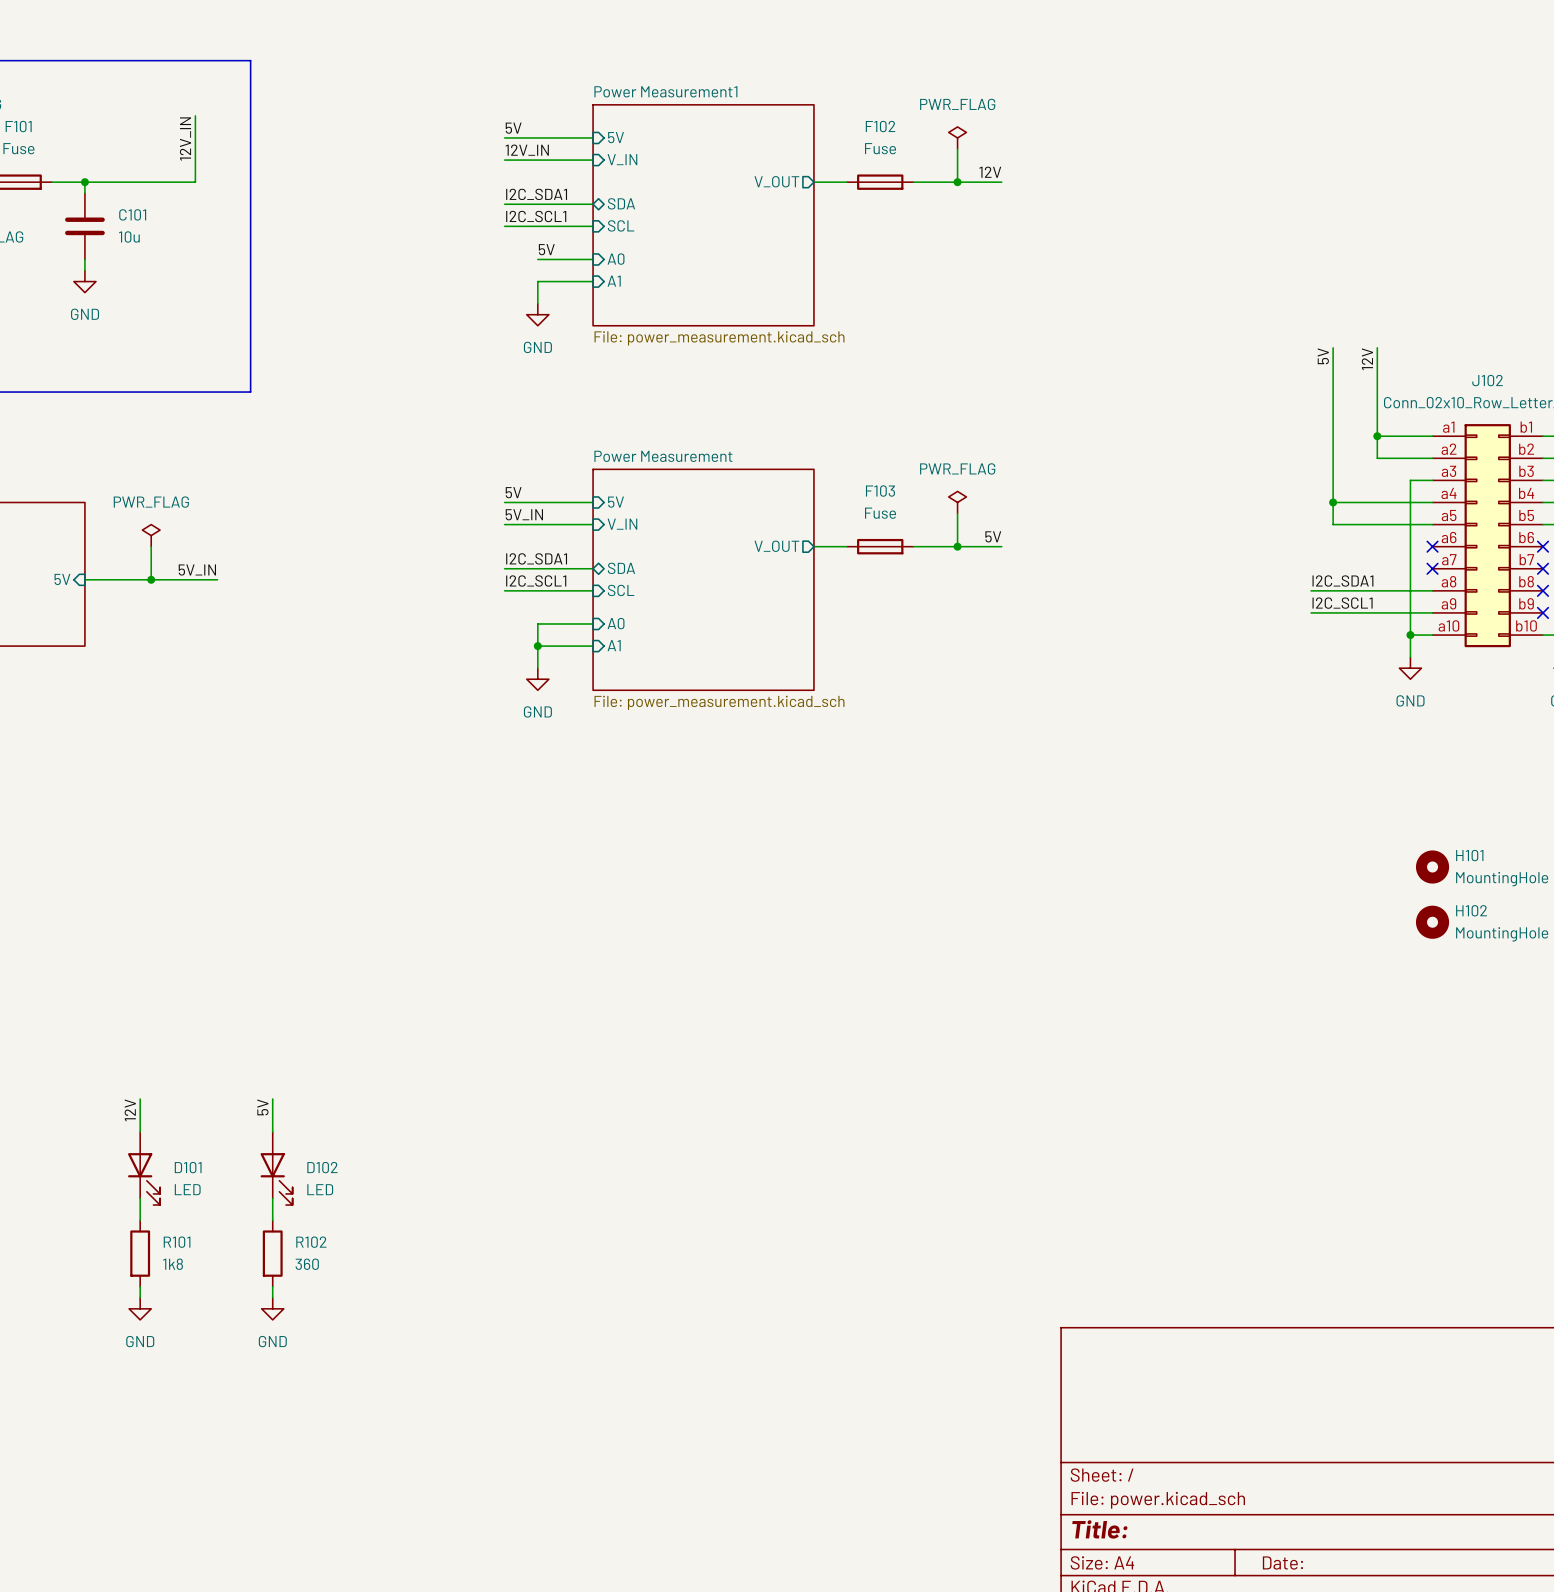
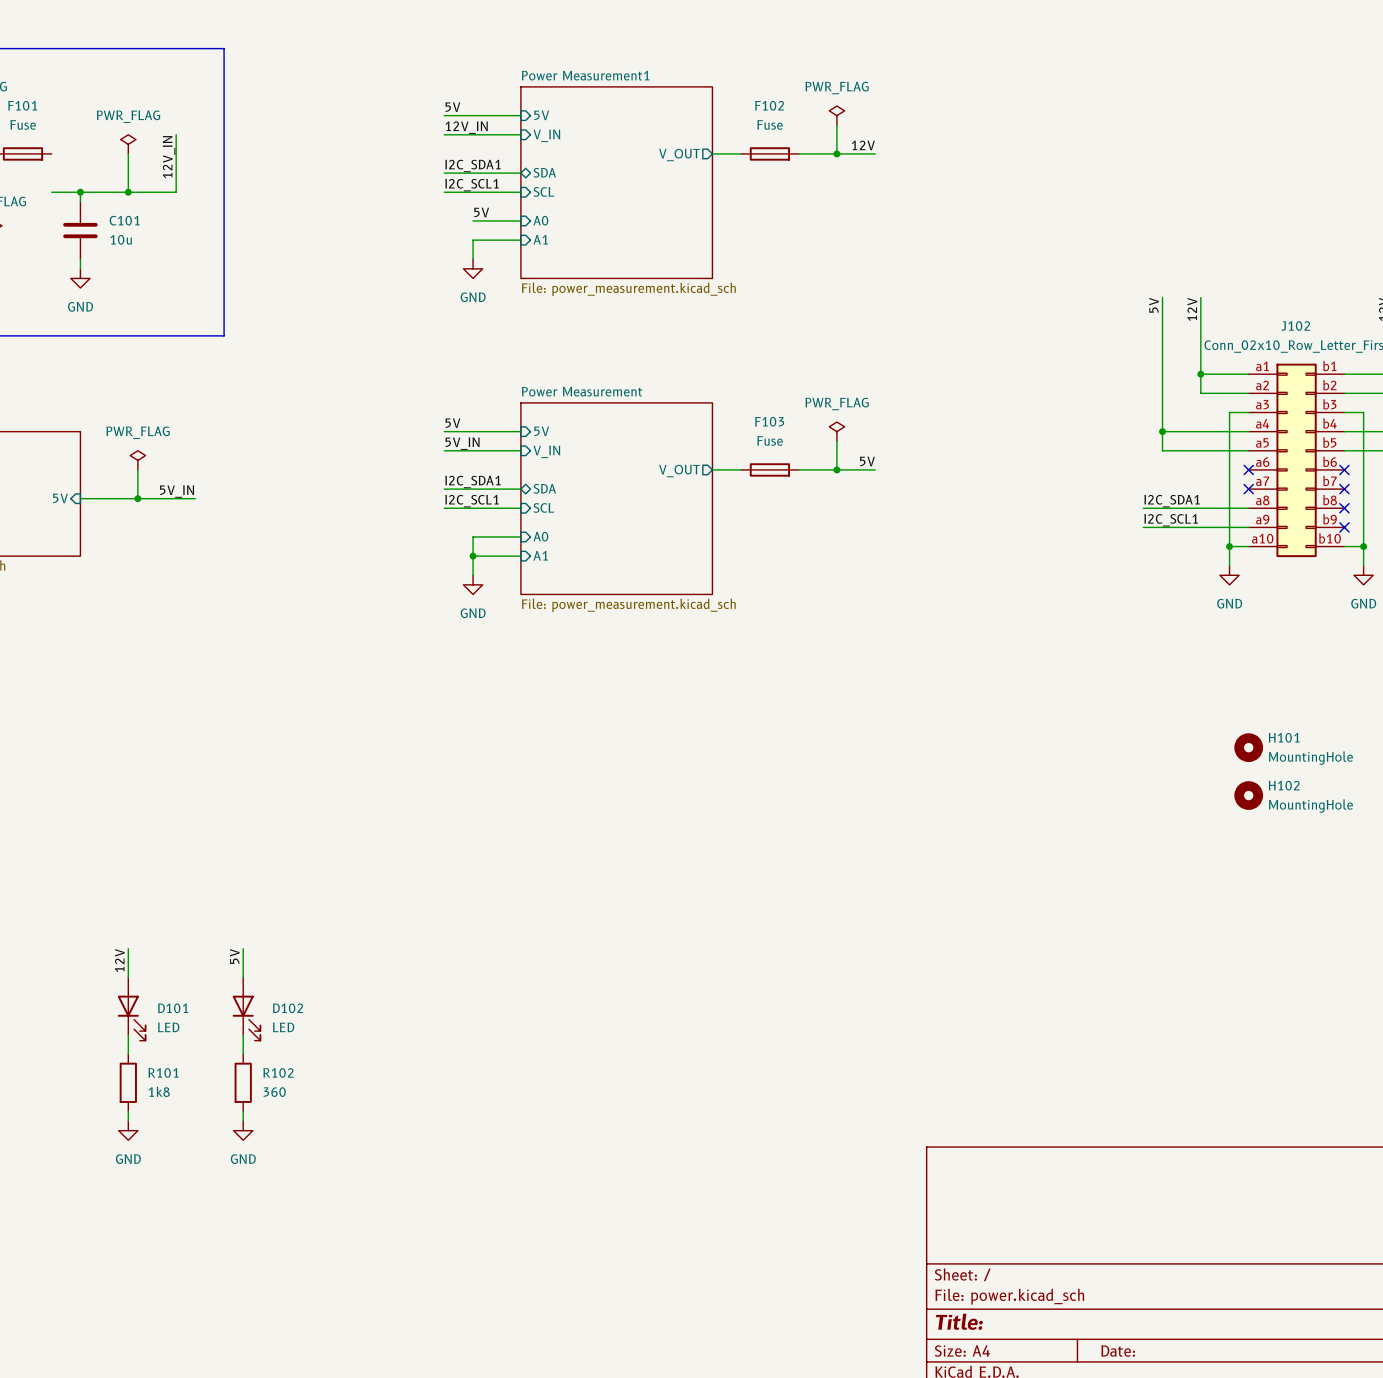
wire: (195, 115) (195, 160) -> (128, 153) (128, 192)
label position: 12V_IN (185, 139) -> 12V_IN (169, 157)
power symbol: none -> PWR_FLAG (128, 144)
wire: (51, 182) (195, 182) -> (51, 192) (176, 192) (176, 153)
junction: (84, 182) -> none
junction: none -> (80, 192)
C101 position: (84, 226) -> (80, 230)
junction: none -> (128, 192)
power symbol position: GND (84, 281) -> GND (80, 278)

